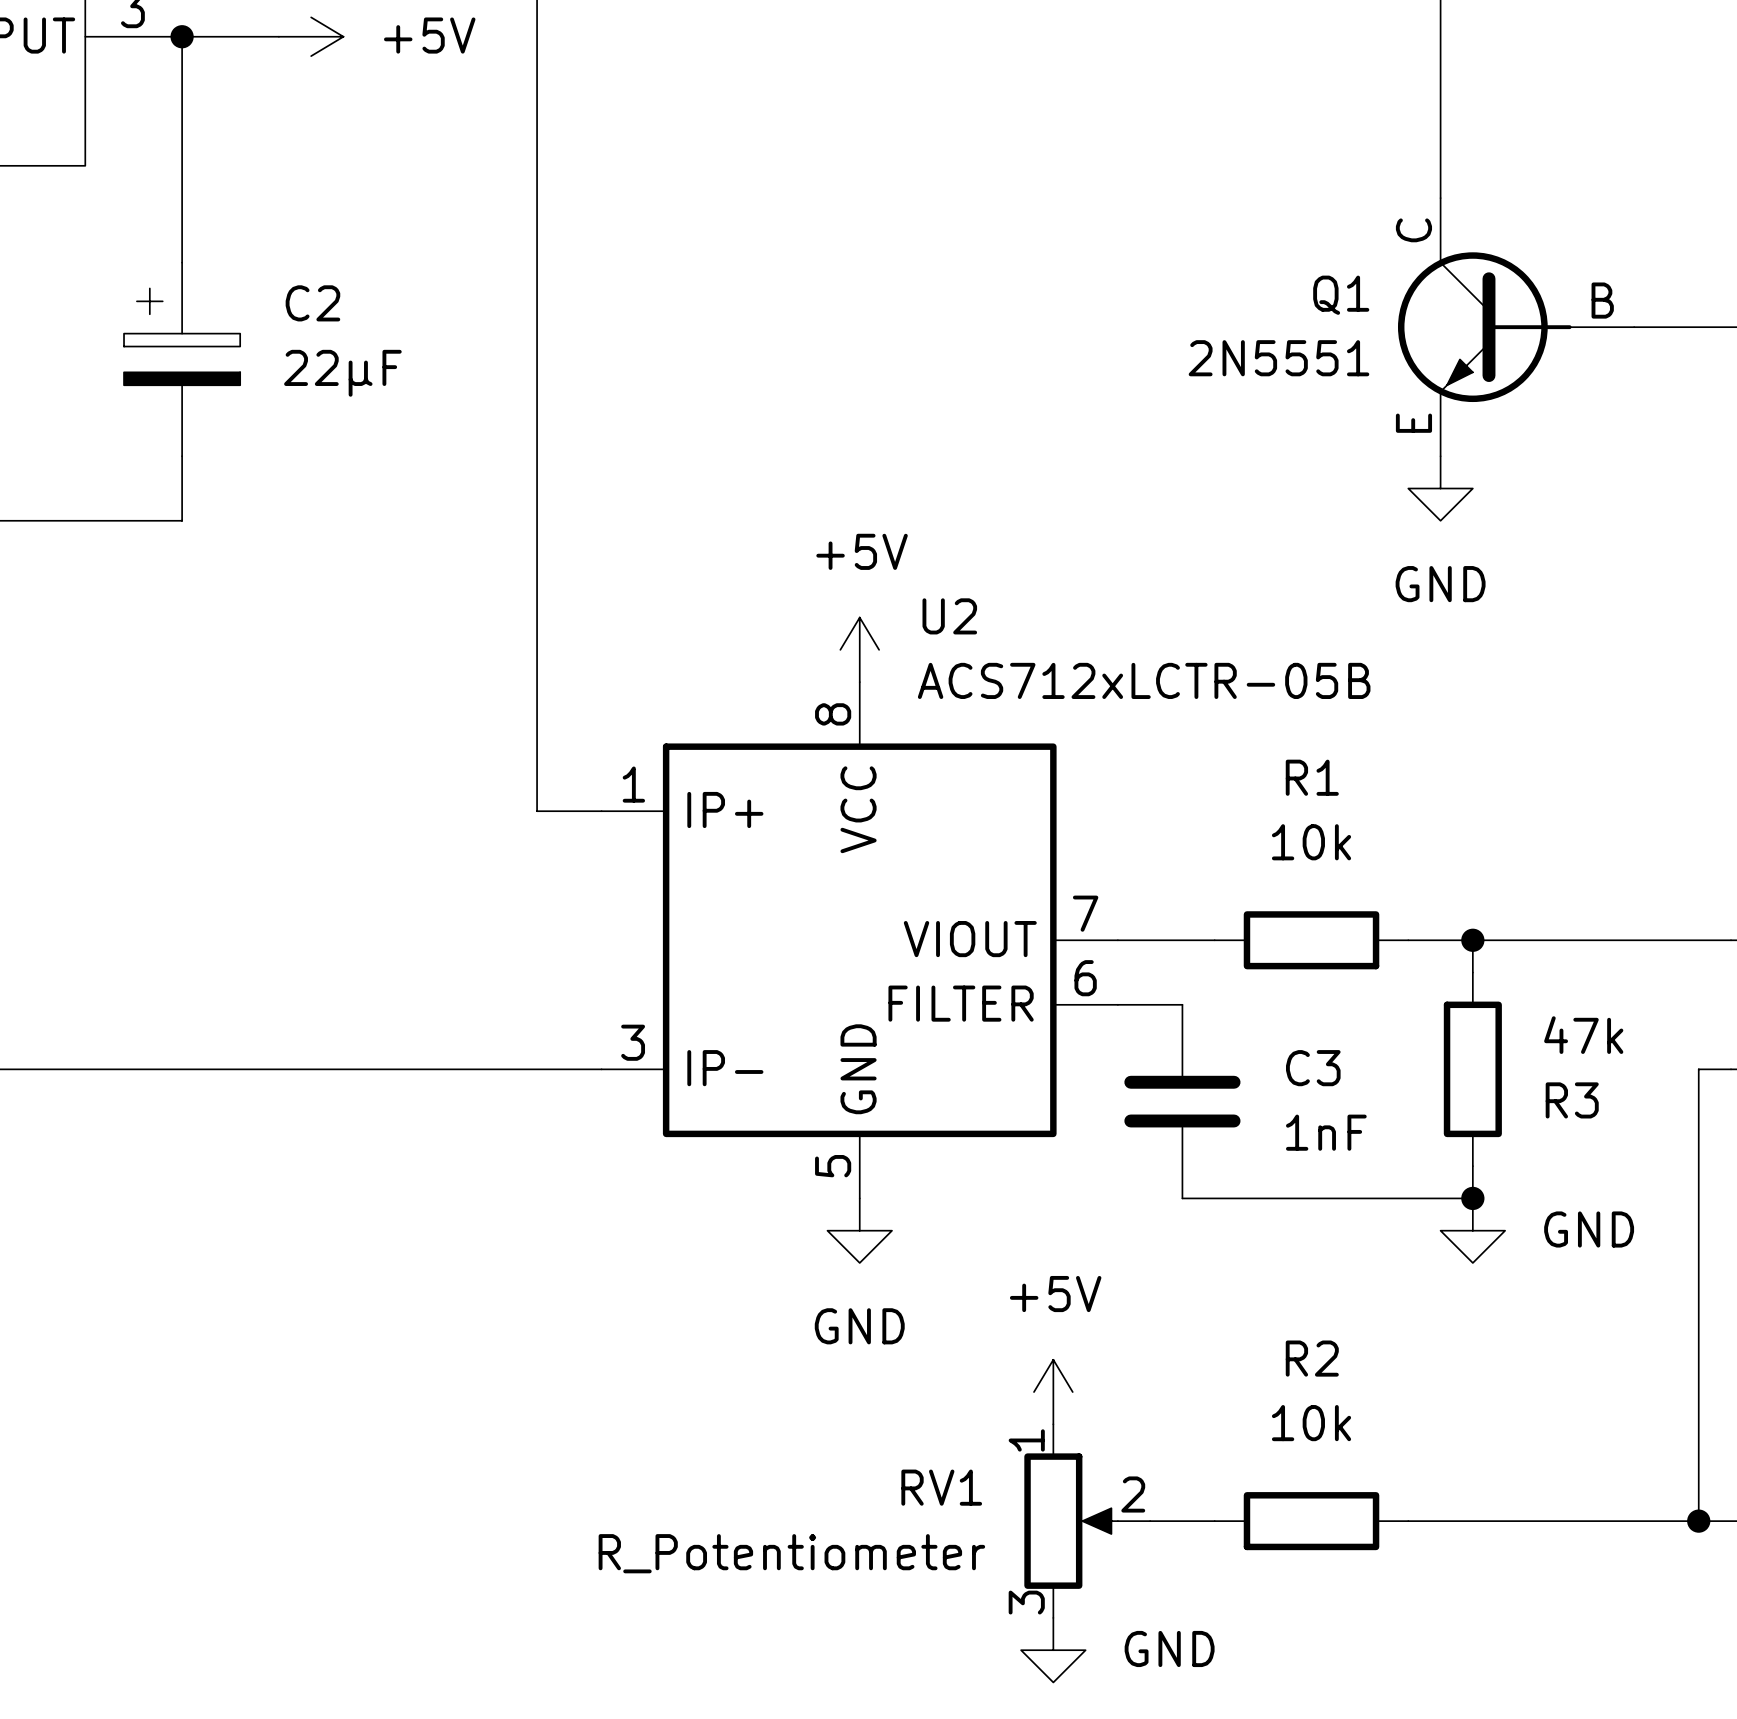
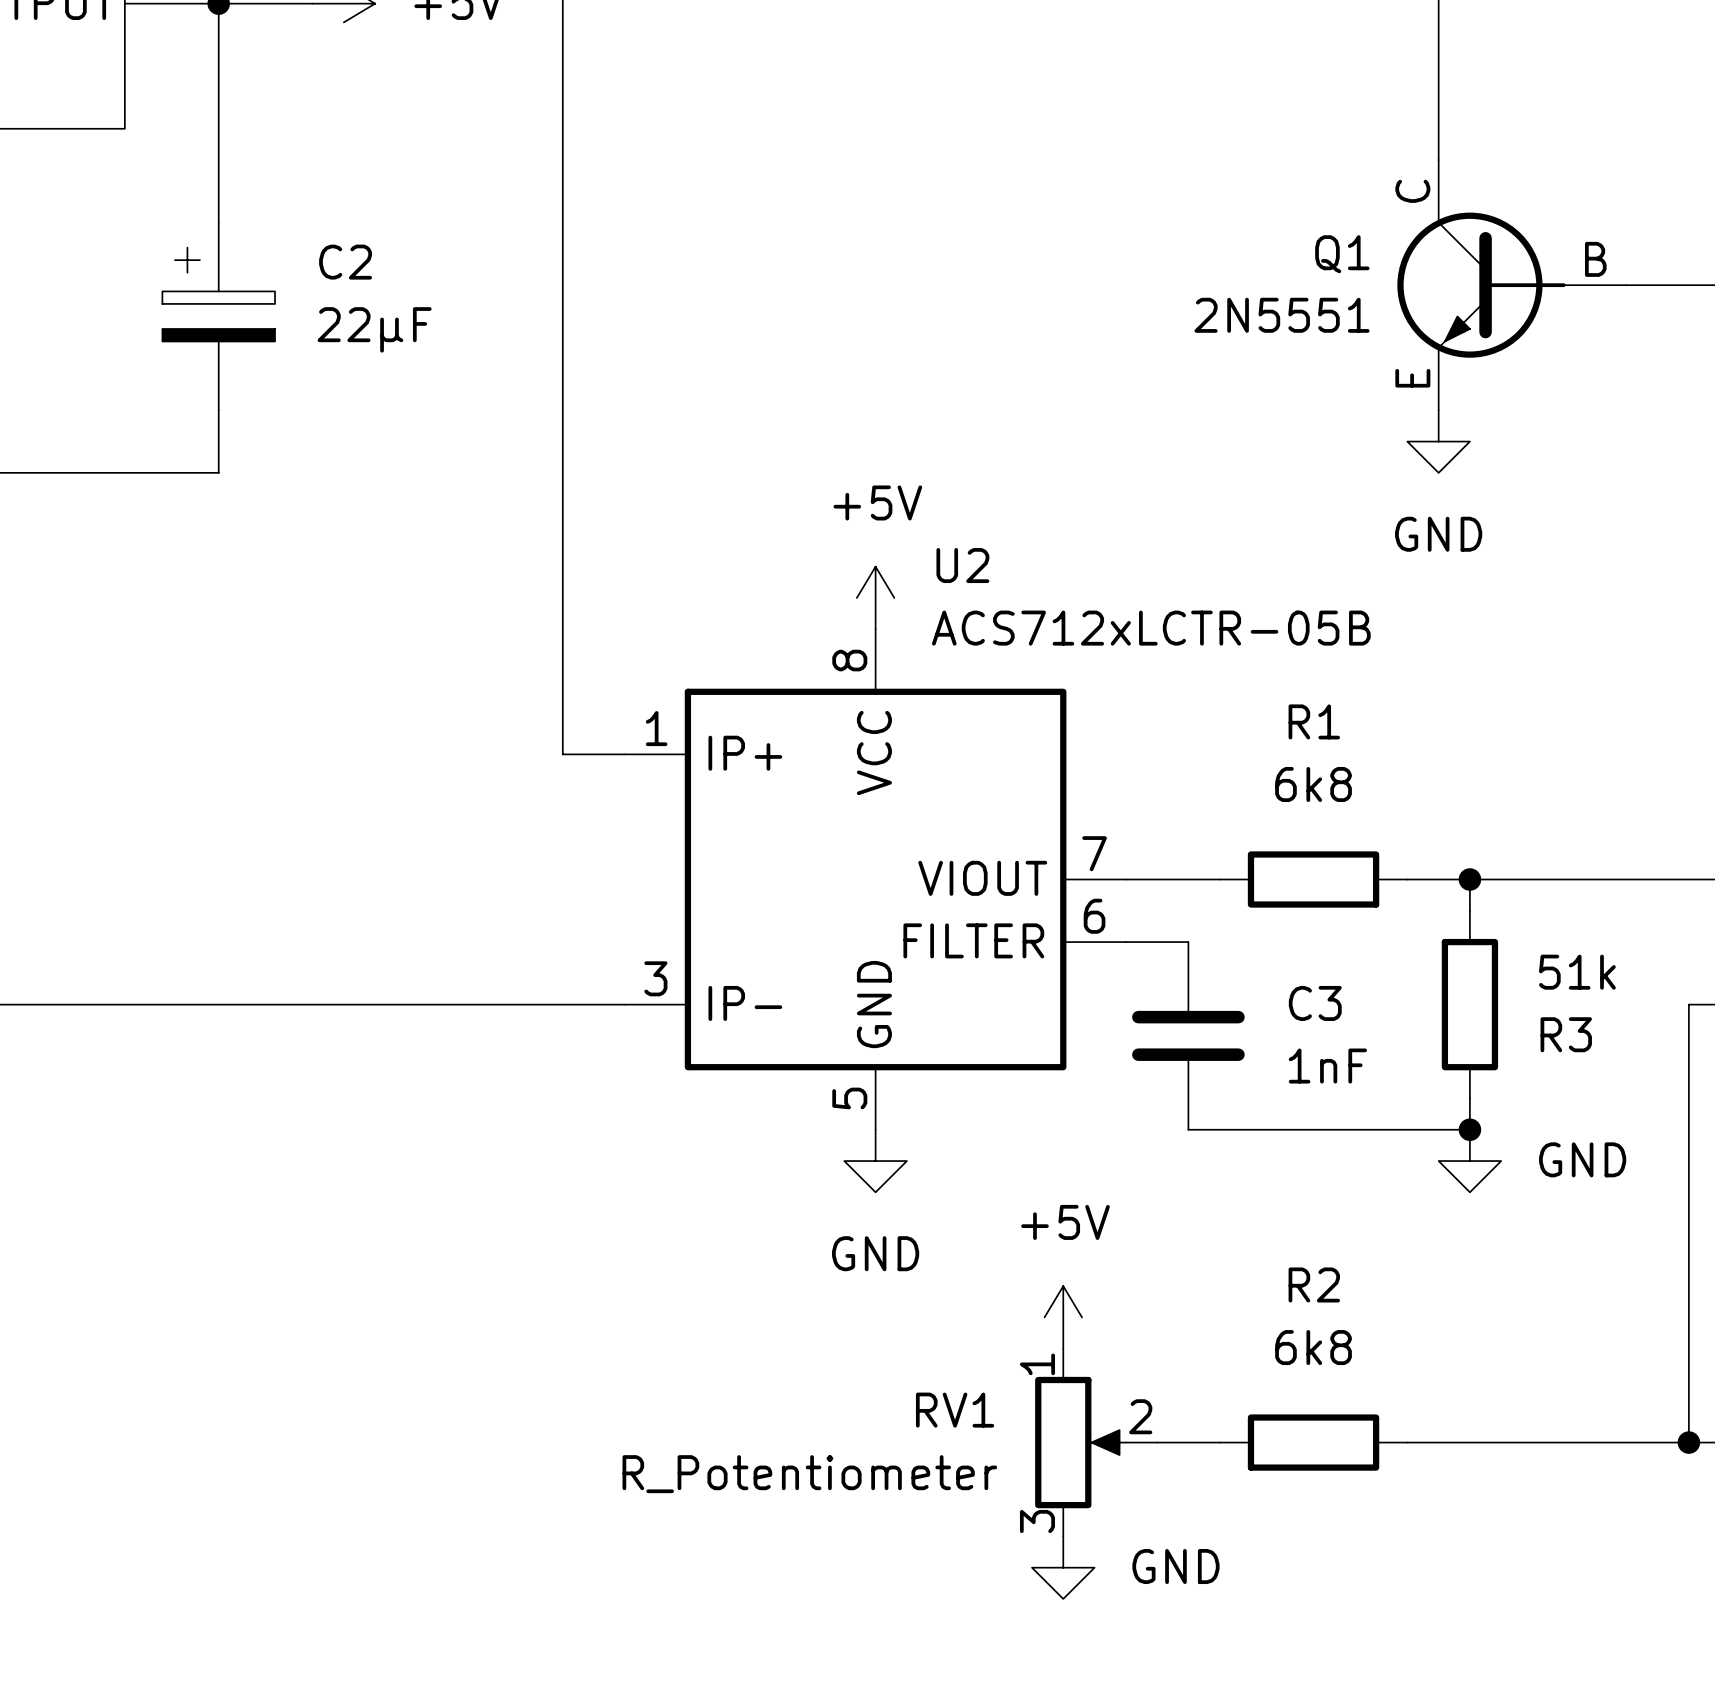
R1 value: 10k (1311, 842) -> 6k8 (1313, 784)
R3 value: 47k (1583, 1035) -> 51k (1577, 972)
R2 value: 10k (1311, 1423) -> 6k8 (1313, 1347)

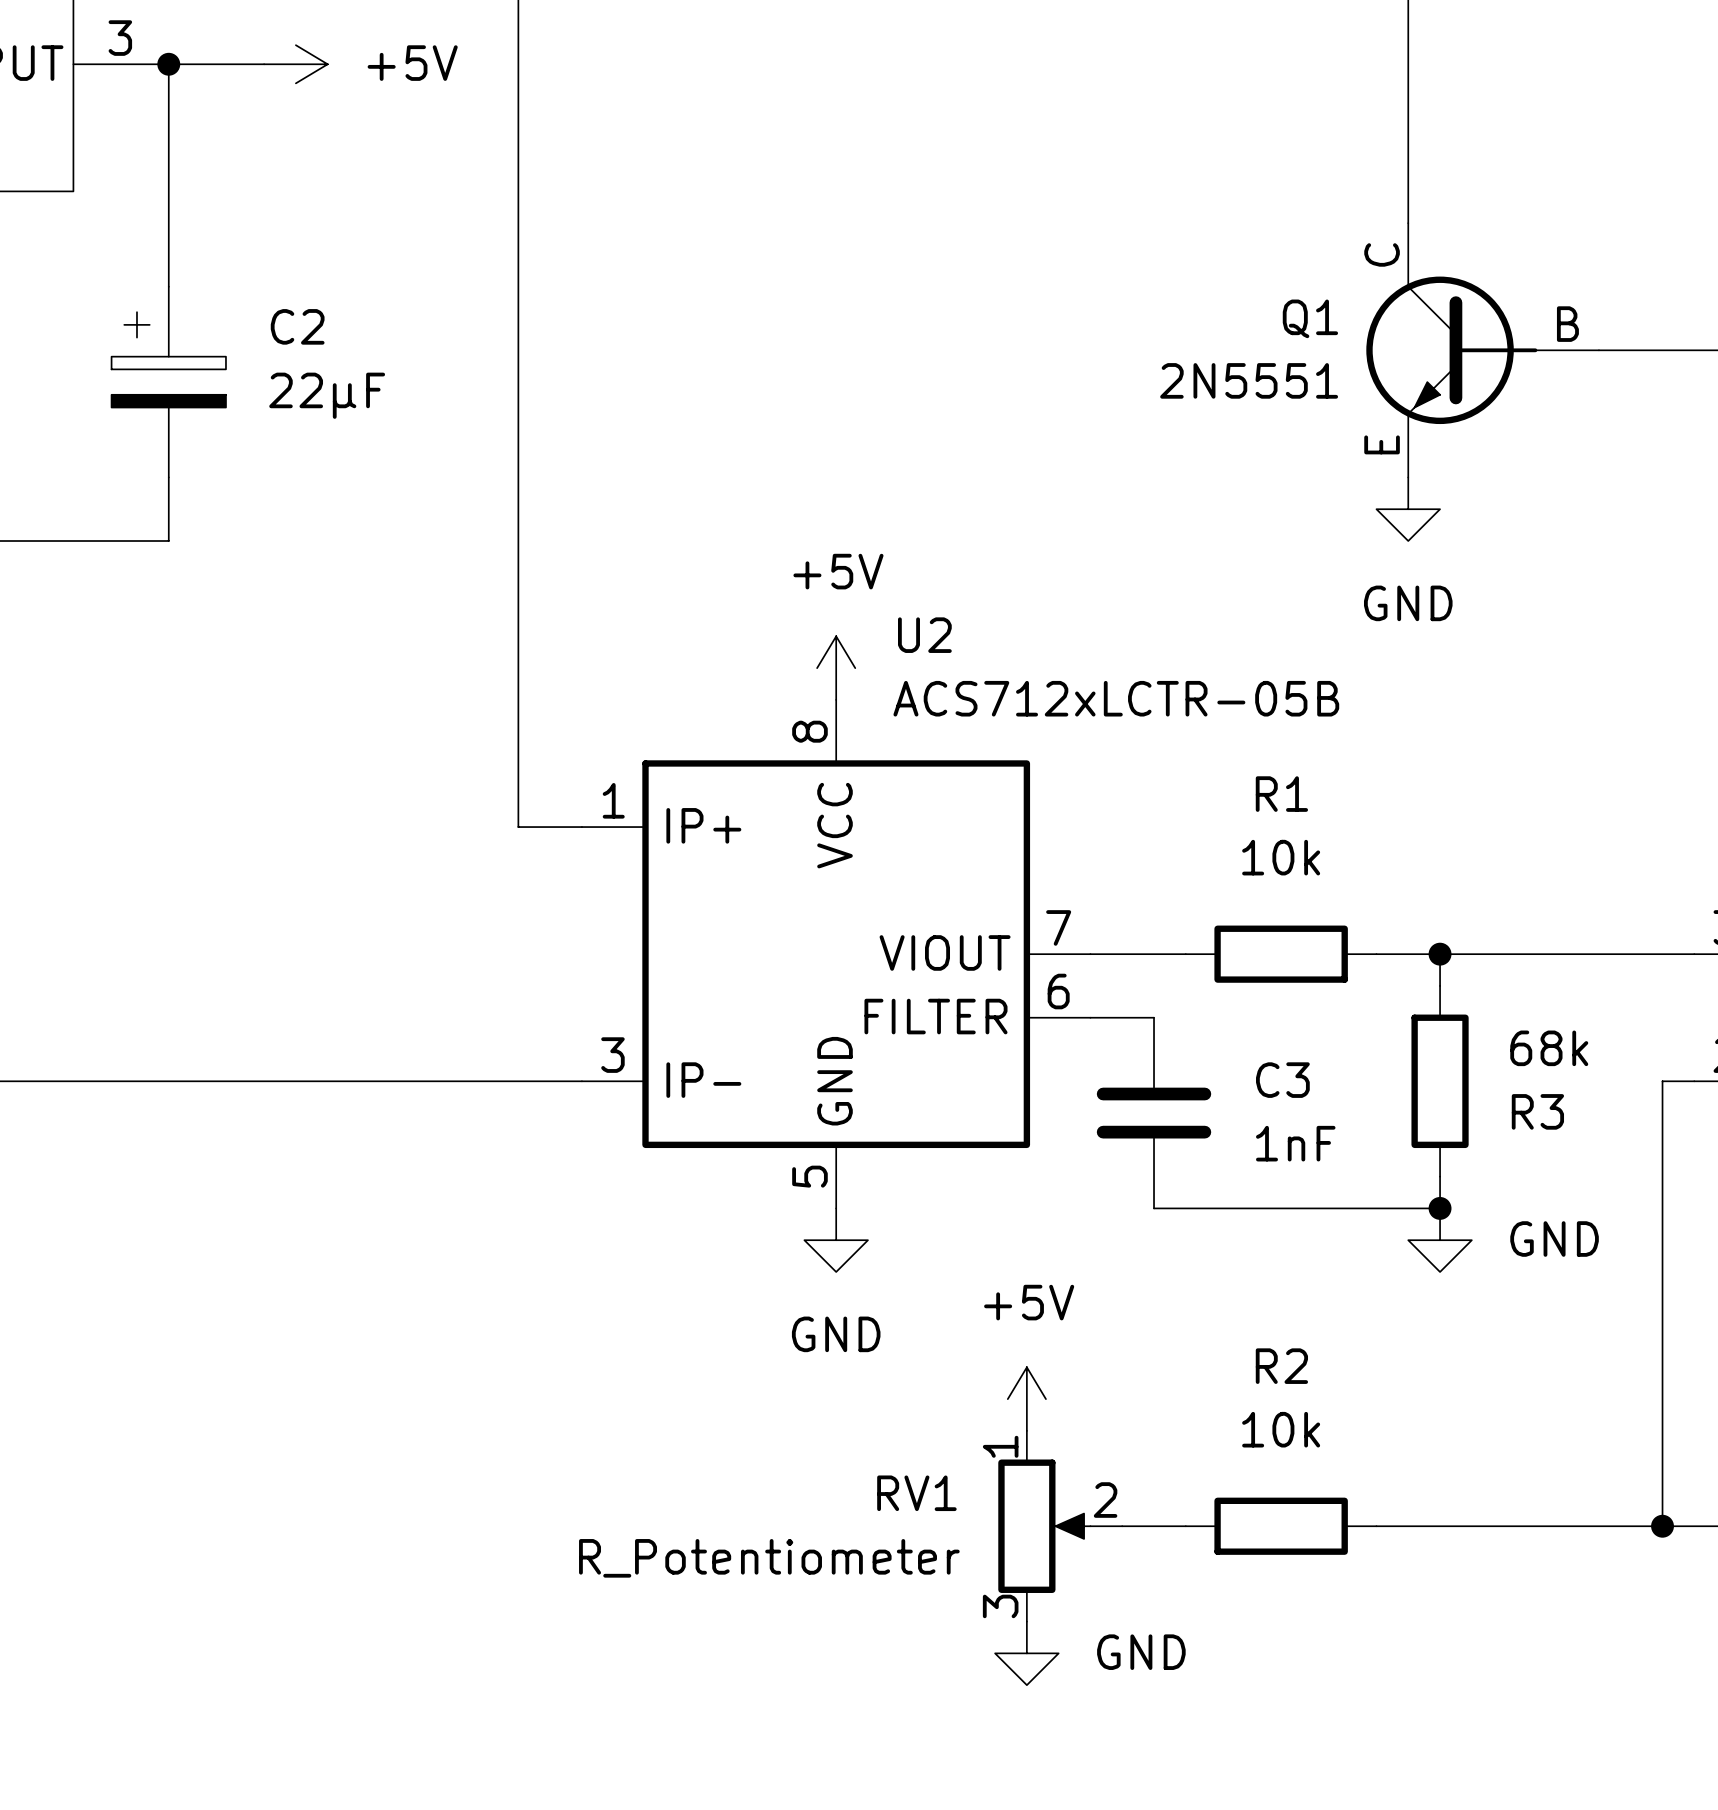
R1 value: 6k8 (1313, 784) -> 10k (1281, 857)
R3 value: 51k (1577, 972) -> 68k (1549, 1048)
R2 value: 6k8 (1313, 1347) -> 10k (1281, 1429)

